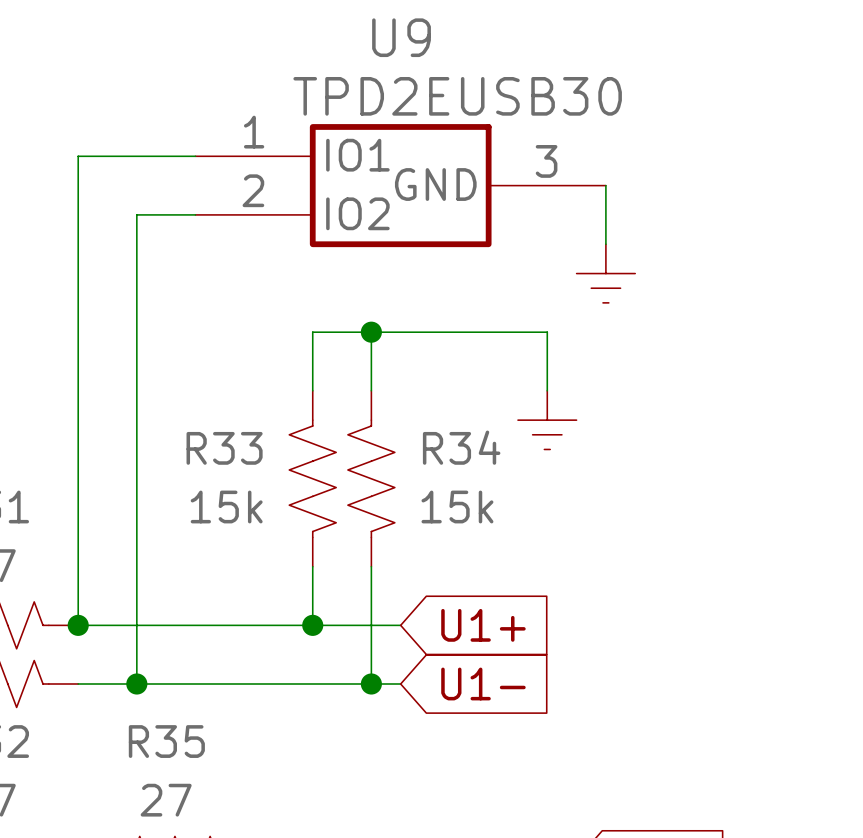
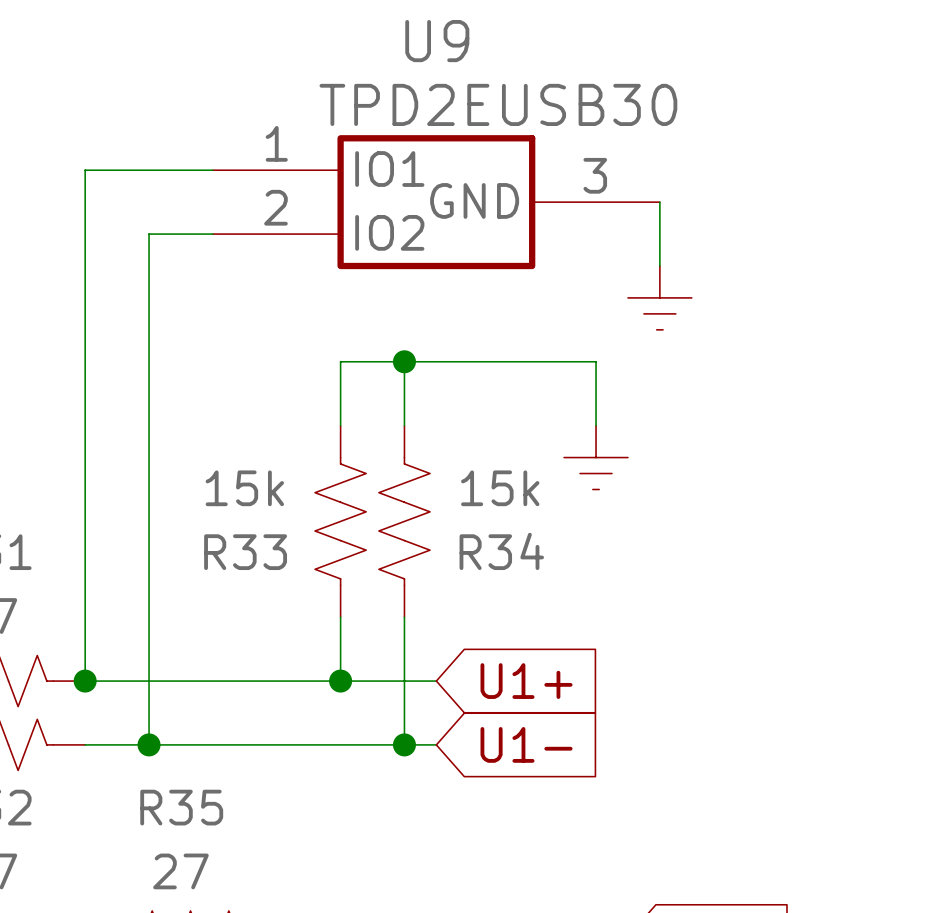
R34 name position: R34 (461, 447) -> R34 (501, 551)
R33 name position: R33 (224, 448) -> R33 (245, 552)
R33 flip: as is (312, 478) -> left-right (340, 521)
R34 flip: as is (371, 478) -> left-right (404, 521)
R33 value position: 15k (226, 507) -> 15k (244, 488)
R34 value position: 15k (457, 507) -> 15k (500, 488)

